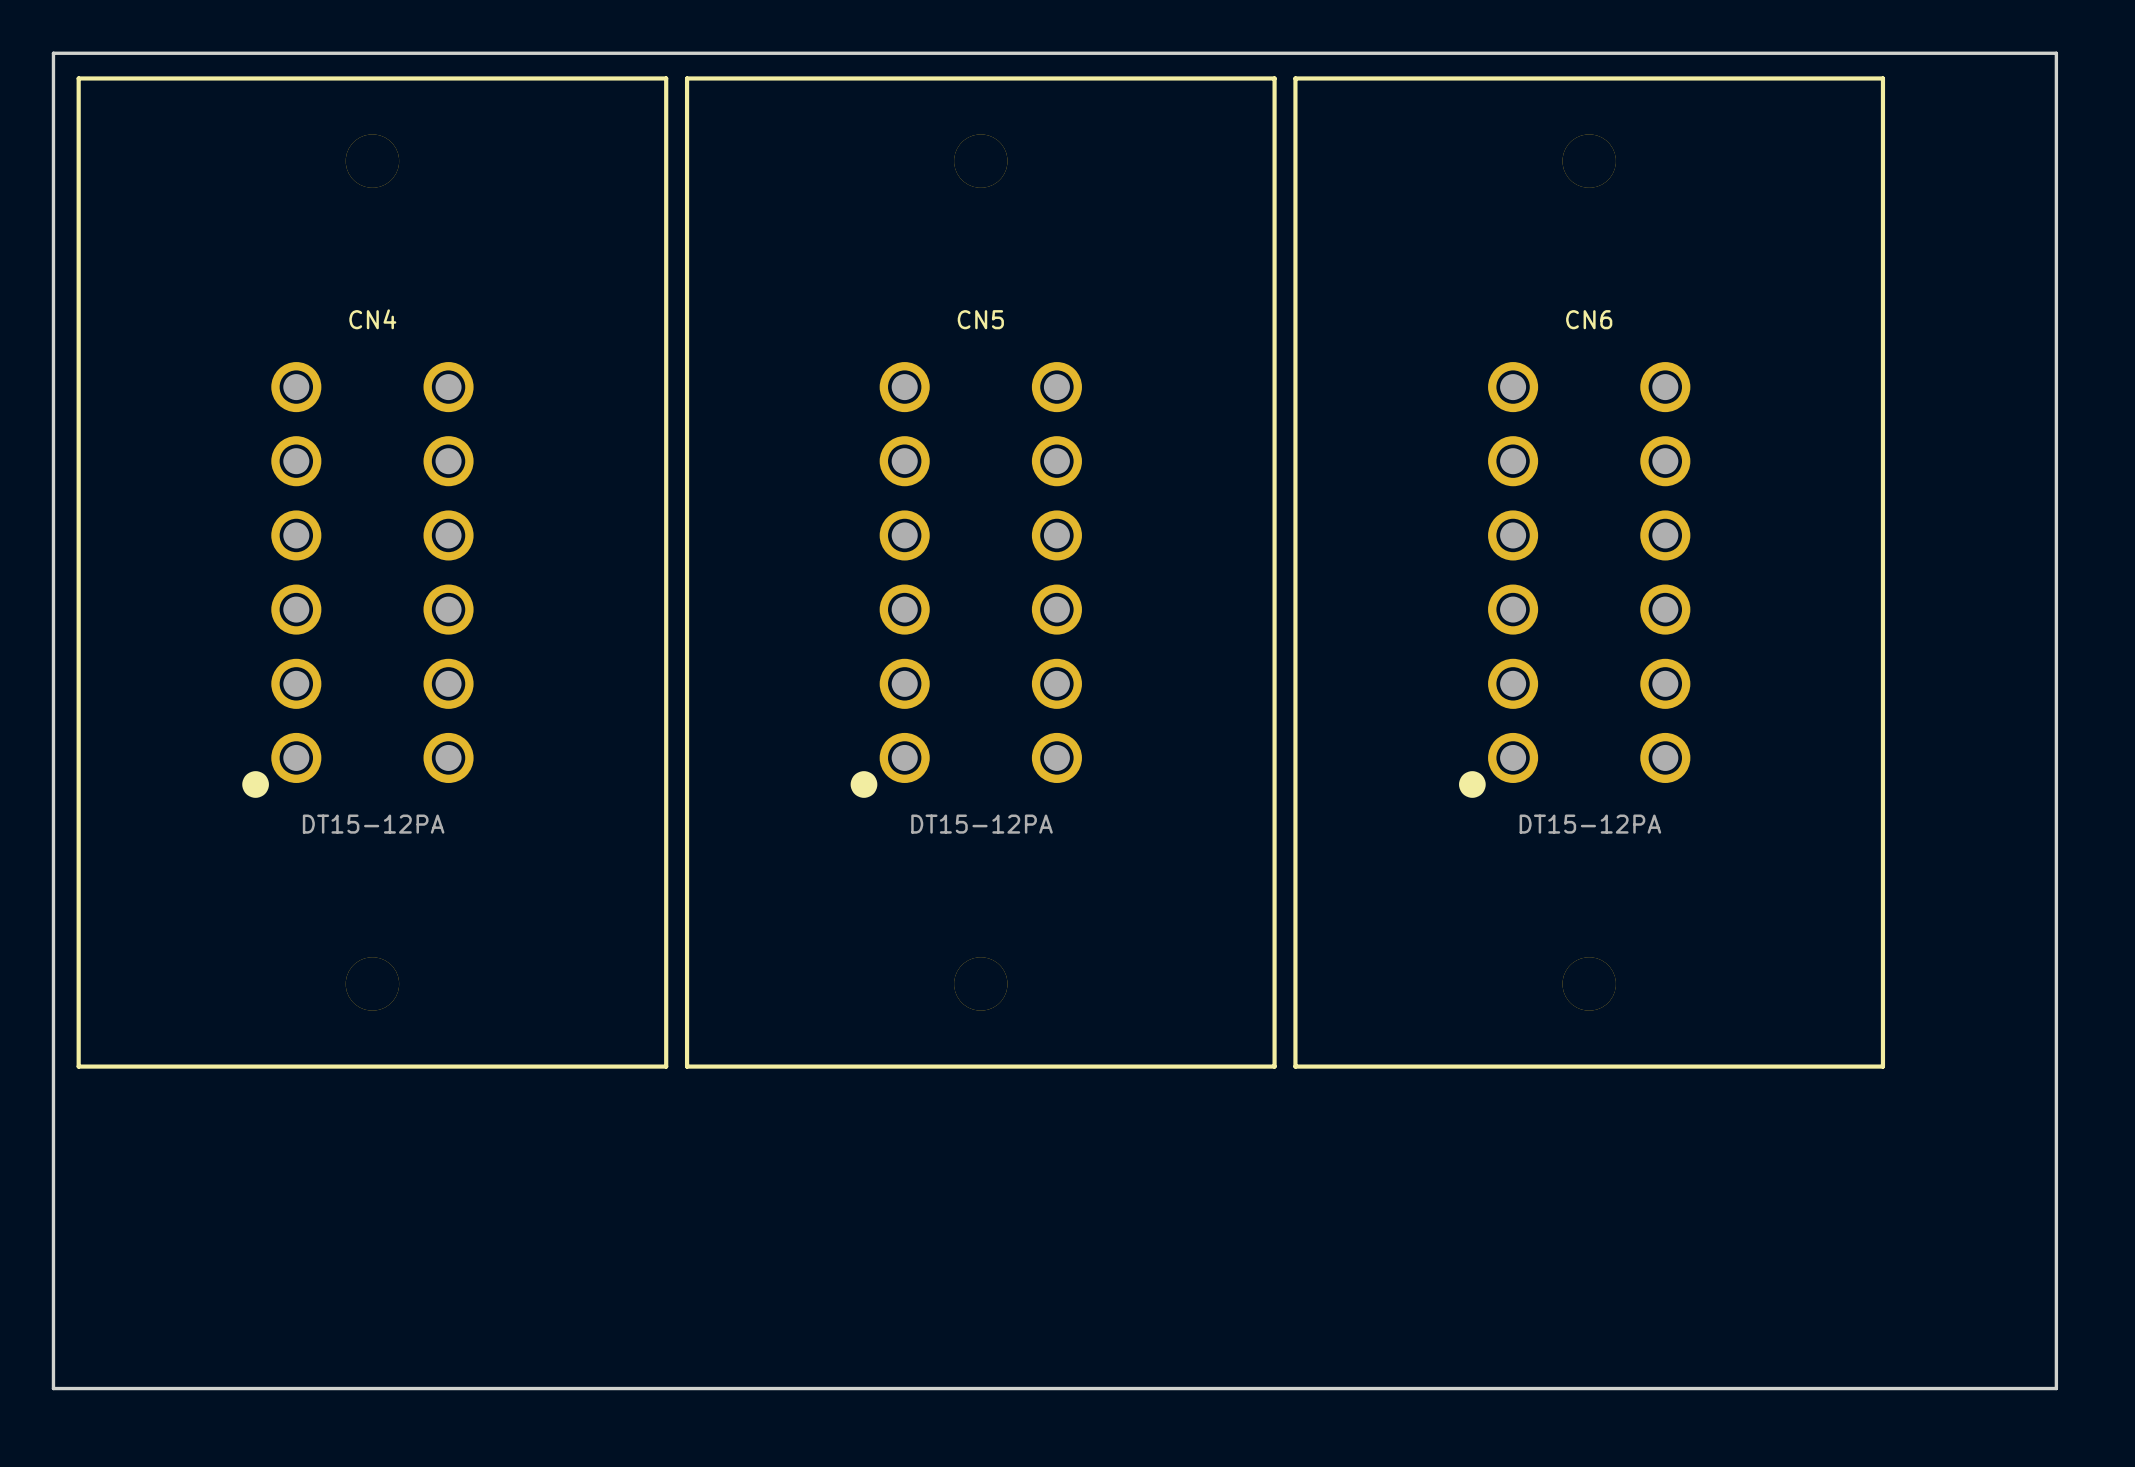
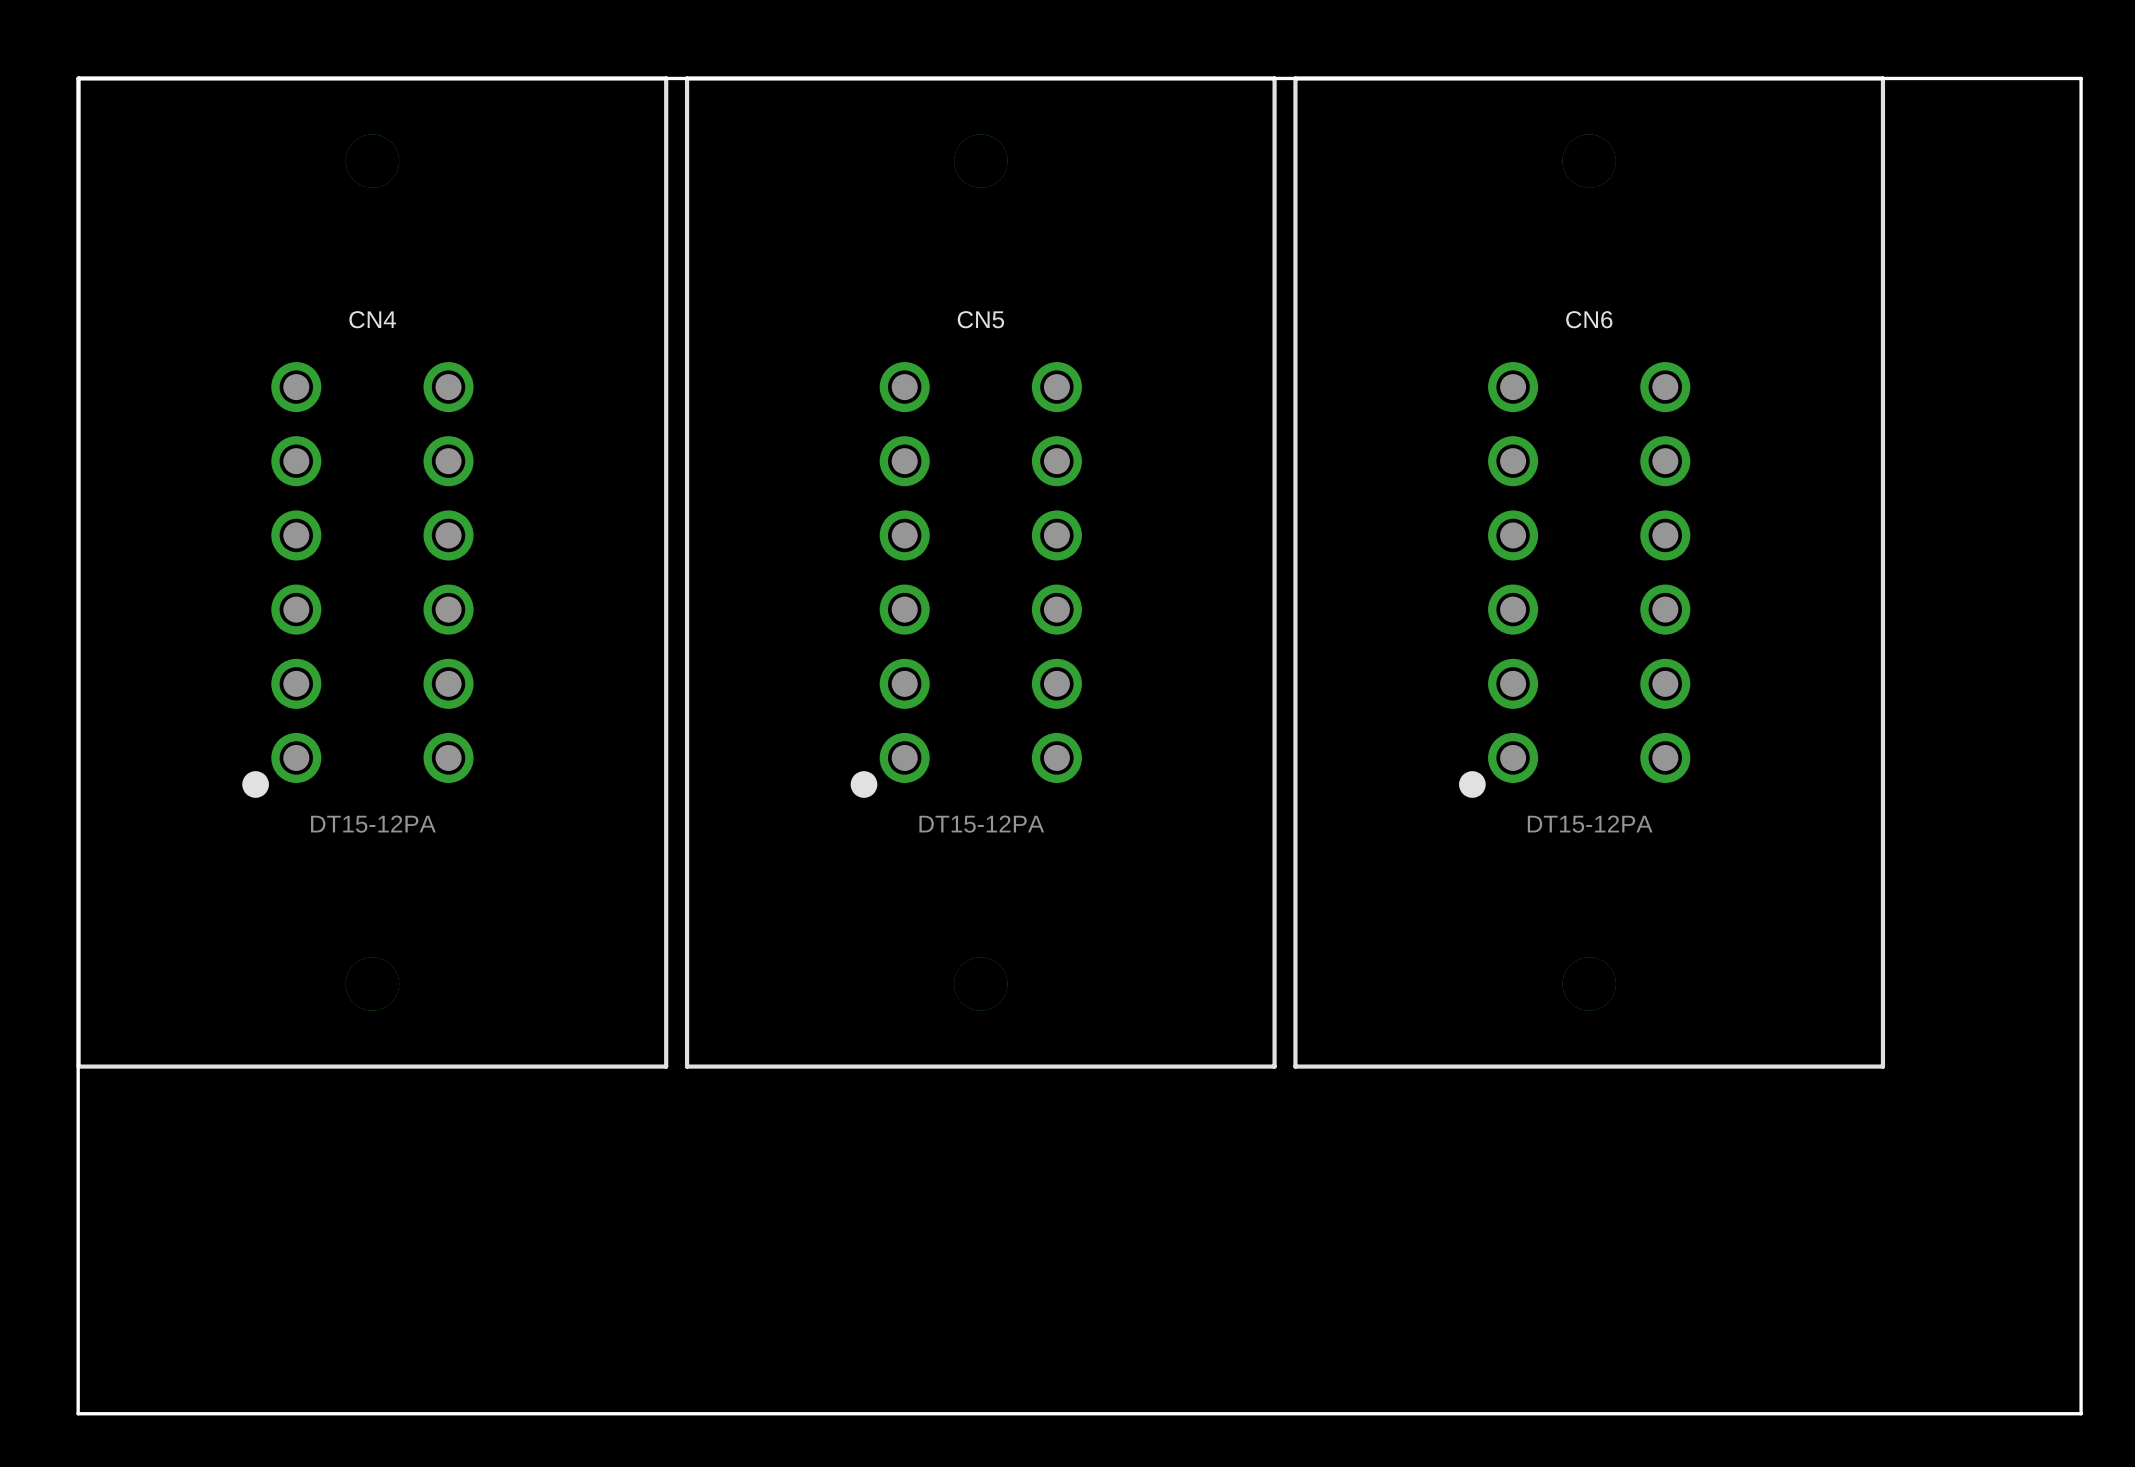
board edge: (53, 53) (2056, 53) (2056, 1388) (53, 1388) (53, 53) -> (78, 78) (2081, 78) (2081, 1413) (78, 1413) (78, 78)

